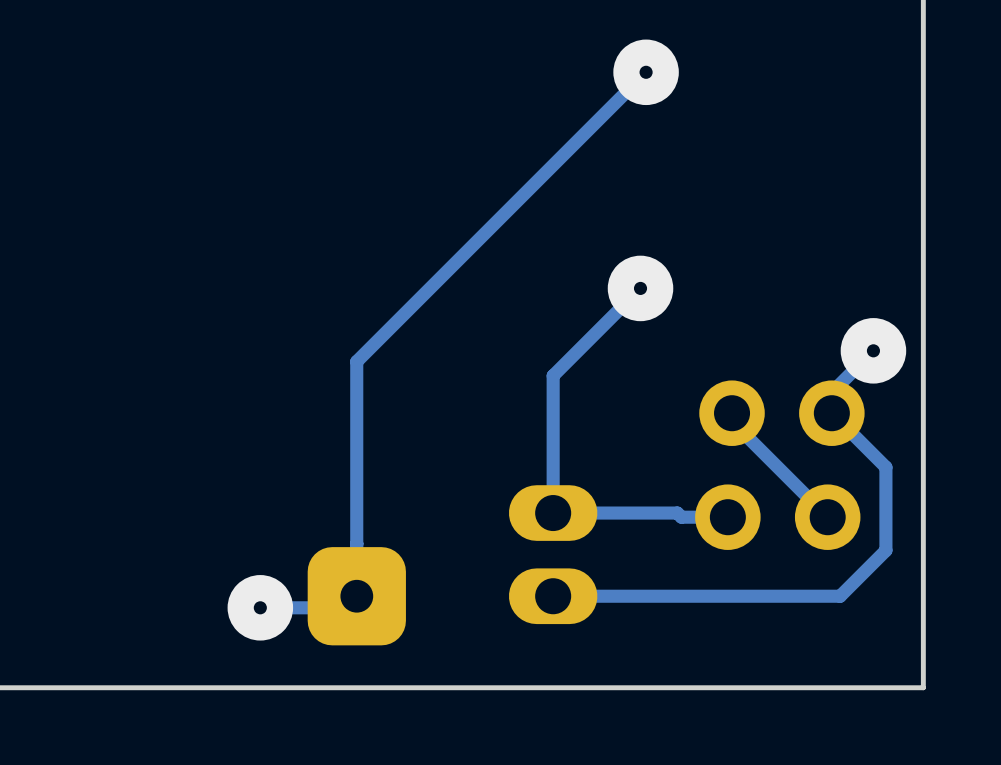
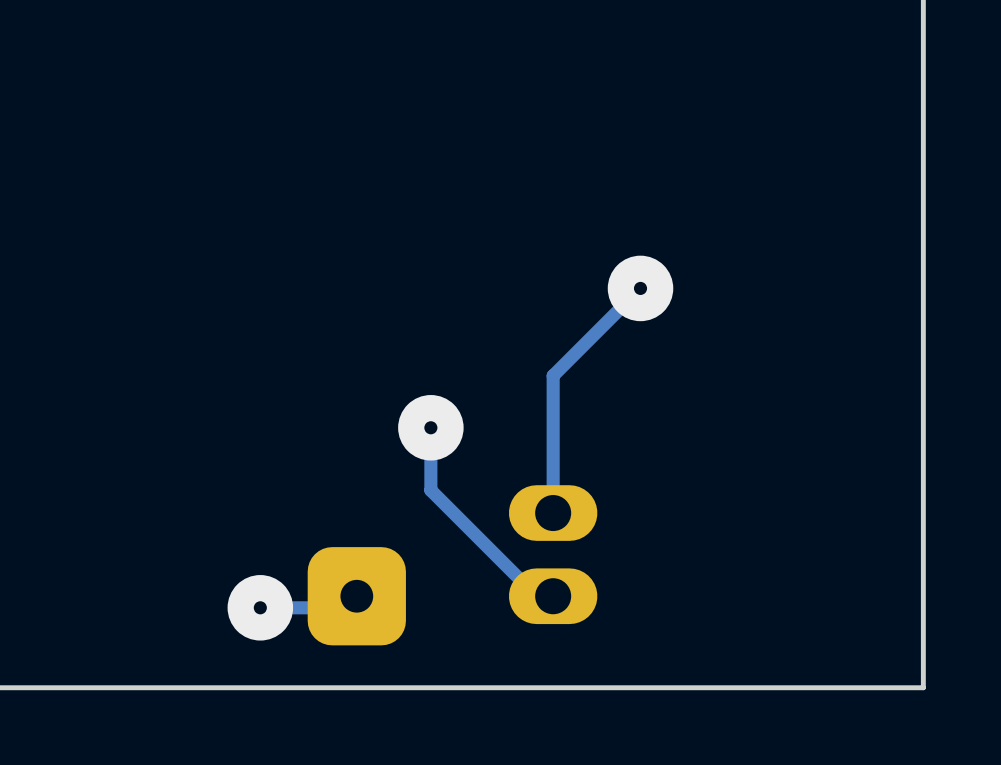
track: (646, 72) (356, 361) (356, 596) -> none
via: (646, 72) -> none
track: (873, 350) (831, 392) (831, 413) (885, 467) (885, 550) (840, 596) (553, 596) -> (430, 427) (430, 490) (536, 596) (553, 596)
via: (873, 350) -> none
track: (732, 413) (732, 421) (827, 517) -> none
part: (781, 413) -> none
via: none -> (430, 427)
track: (723, 513) (727, 517) (681, 517) (677, 513) (572, 513) -> none
part: (777, 517) -> none

